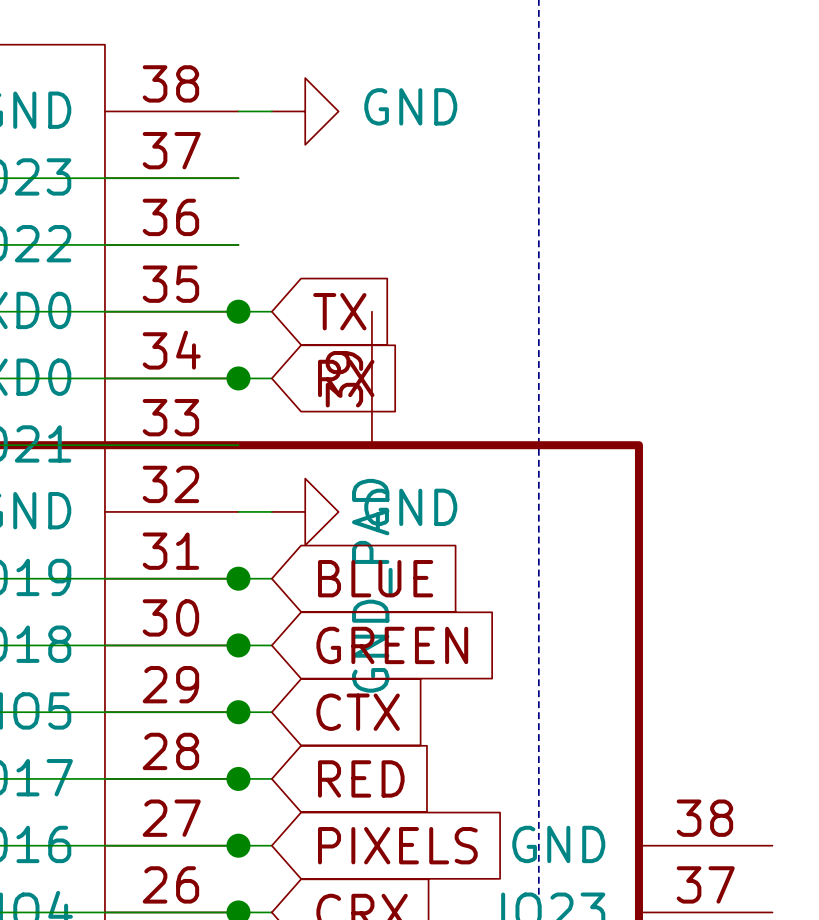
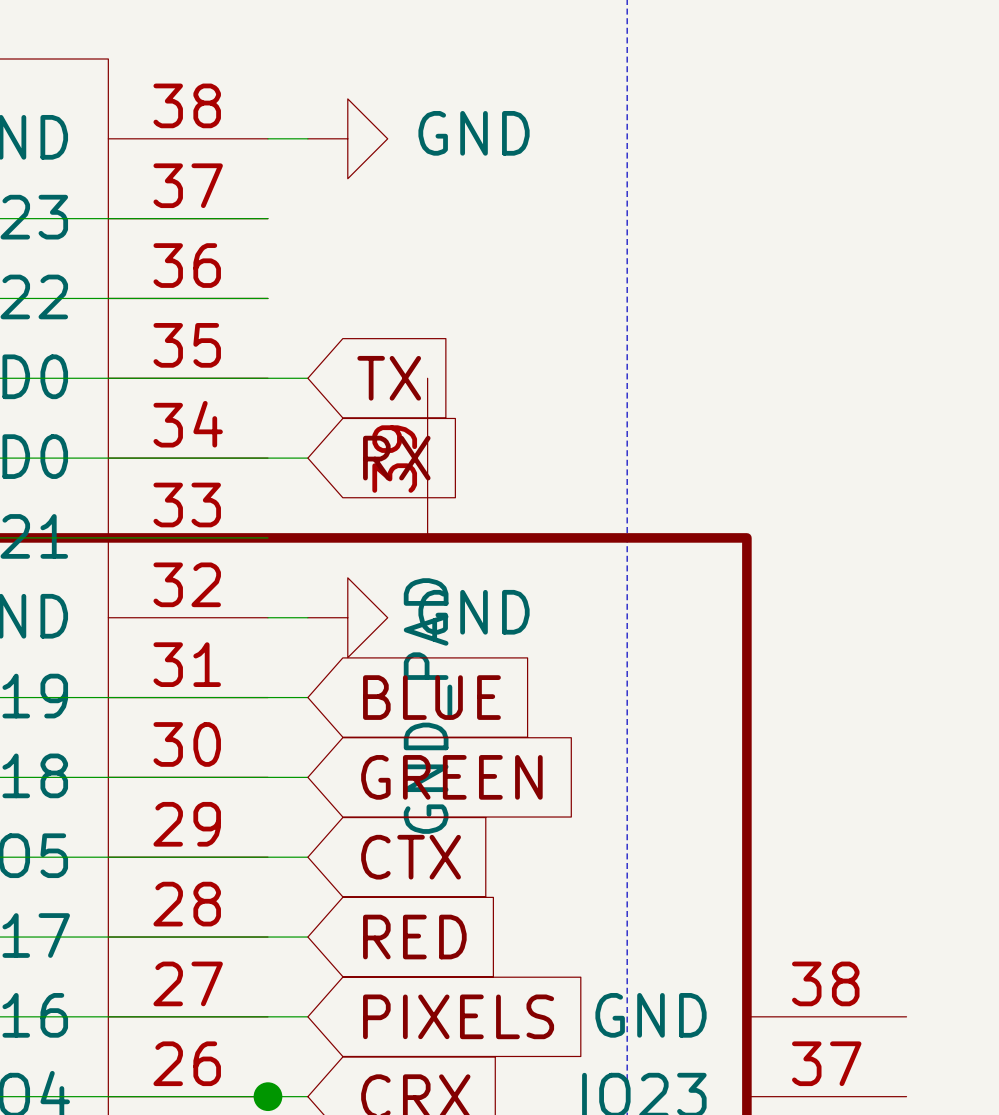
junction: (238, 311) -> none
junction: (238, 378) -> none
junction: (238, 578) -> none
junction: (238, 645) -> none
junction: (238, 712) -> none
junction: (238, 778) -> none
junction: (238, 845) -> none

